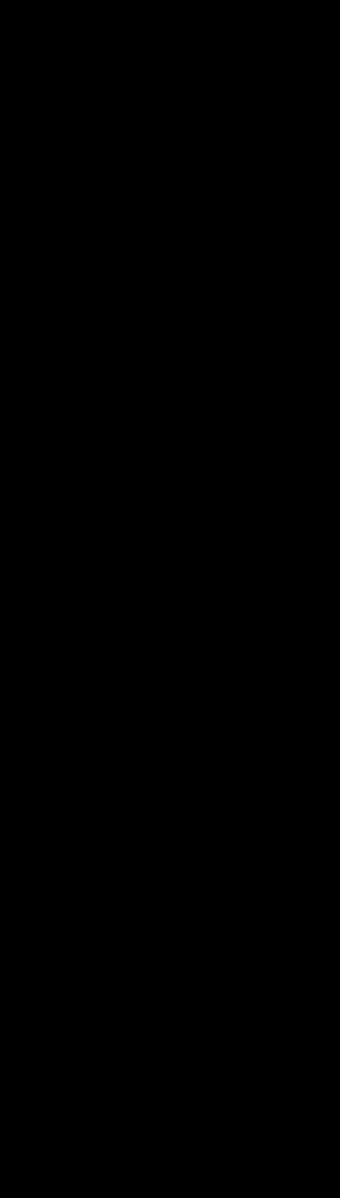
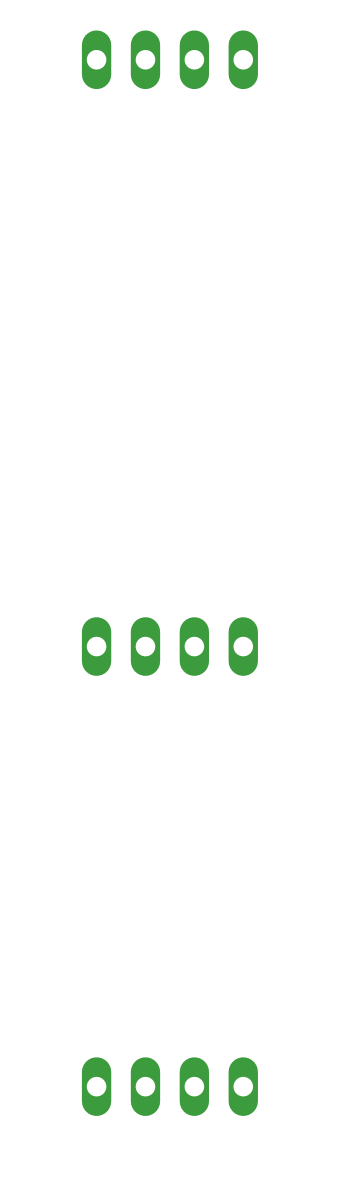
part: none -> (169, 59)
part: none -> (169, 646)
part: none -> (169, 1086)

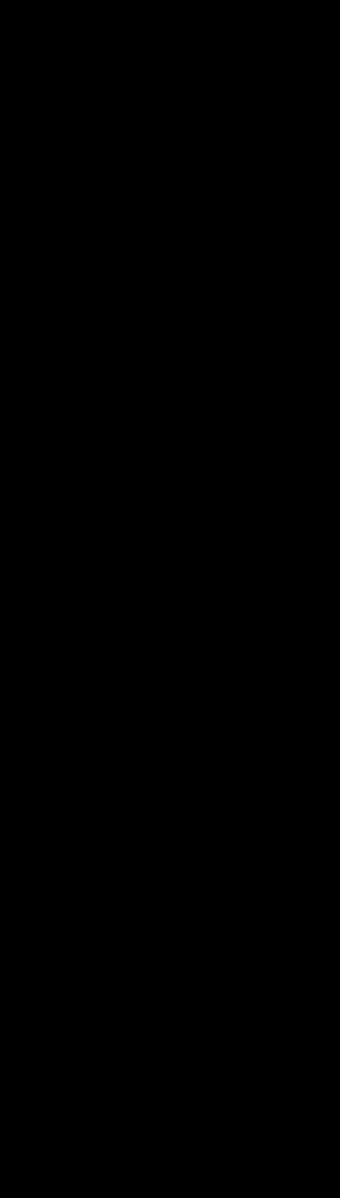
part: (169, 59) -> none
part: (169, 646) -> none
part: (169, 1086) -> none

